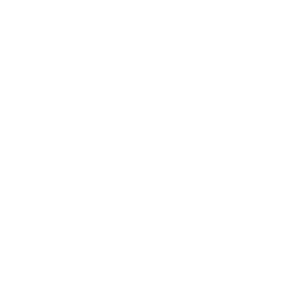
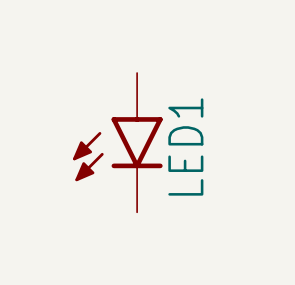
LED1: none -> (117, 142)

